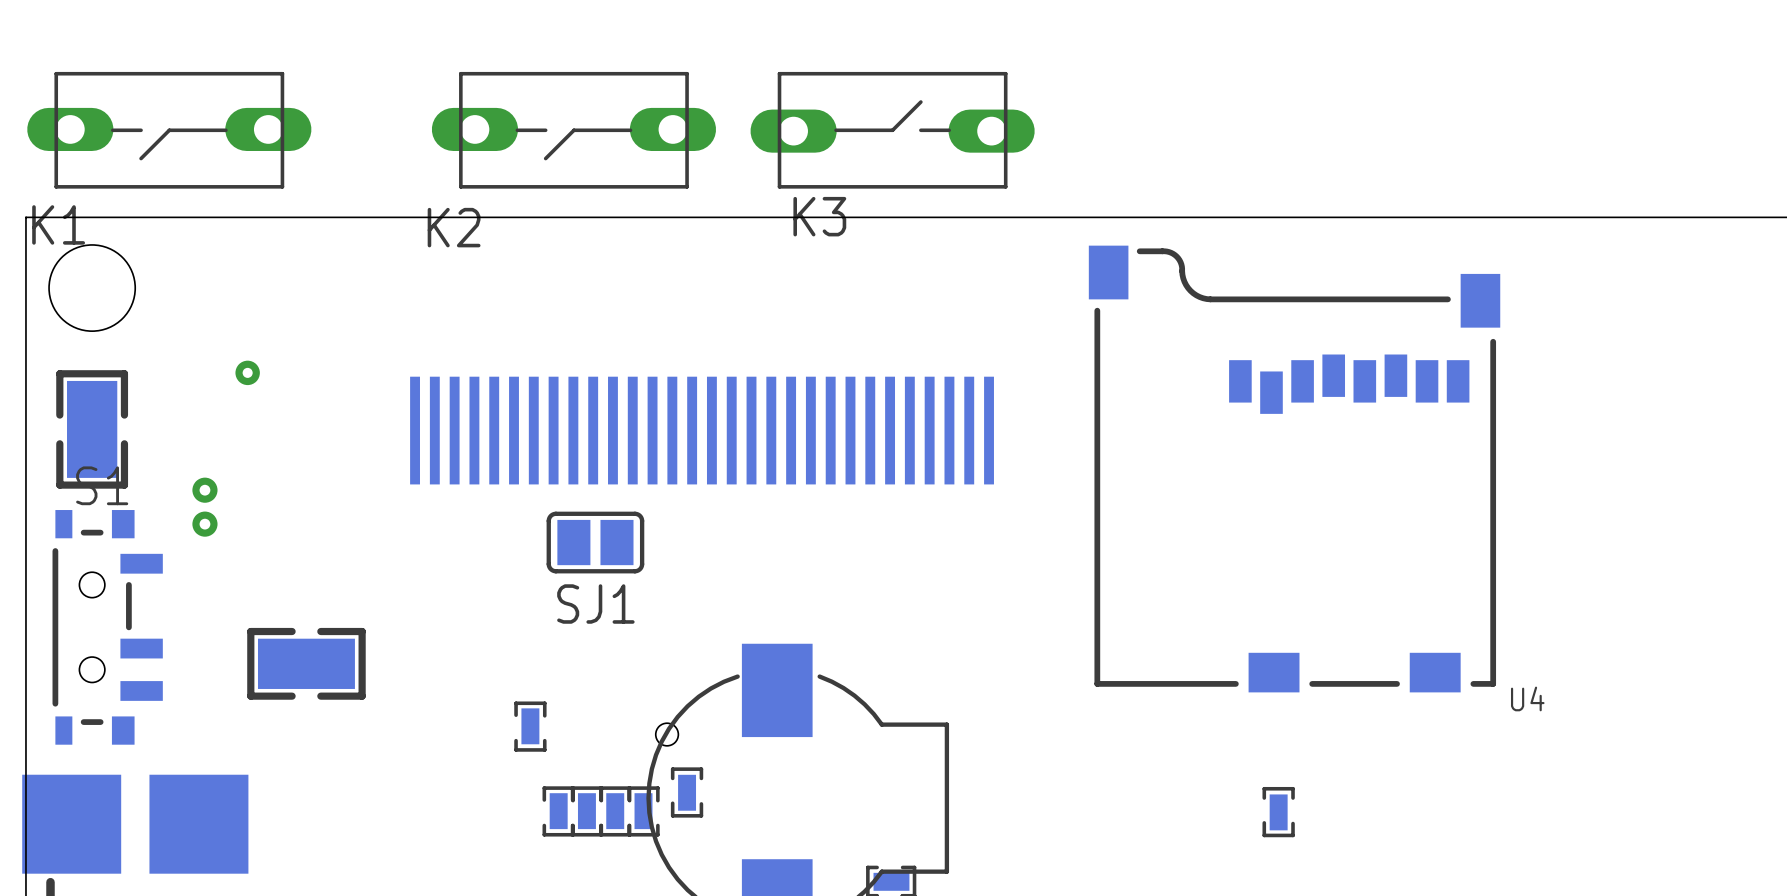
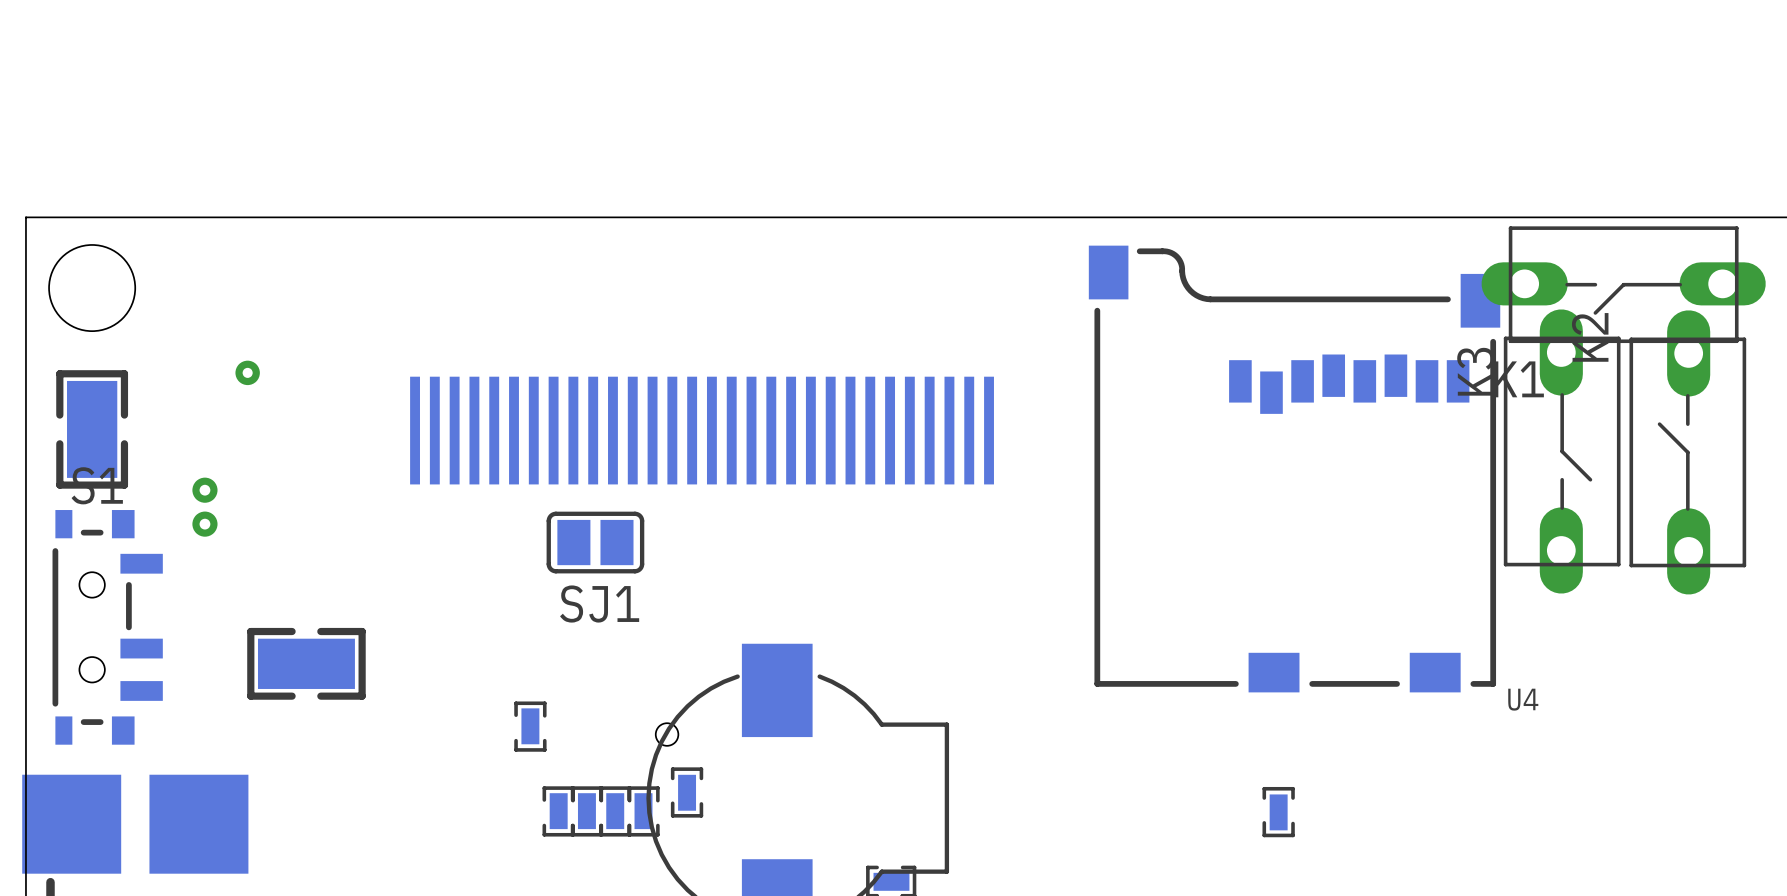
K1 position: (169, 130) -> (1623, 284)
K2 rotation: 0° (573, 130) -> 90° clockwise (1687, 452)
K2 position: (573, 130) -> (1687, 452)
K3 rotation: 0° (892, 130) -> 90° clockwise (1562, 451)
K3 position: (892, 130) -> (1562, 451)

